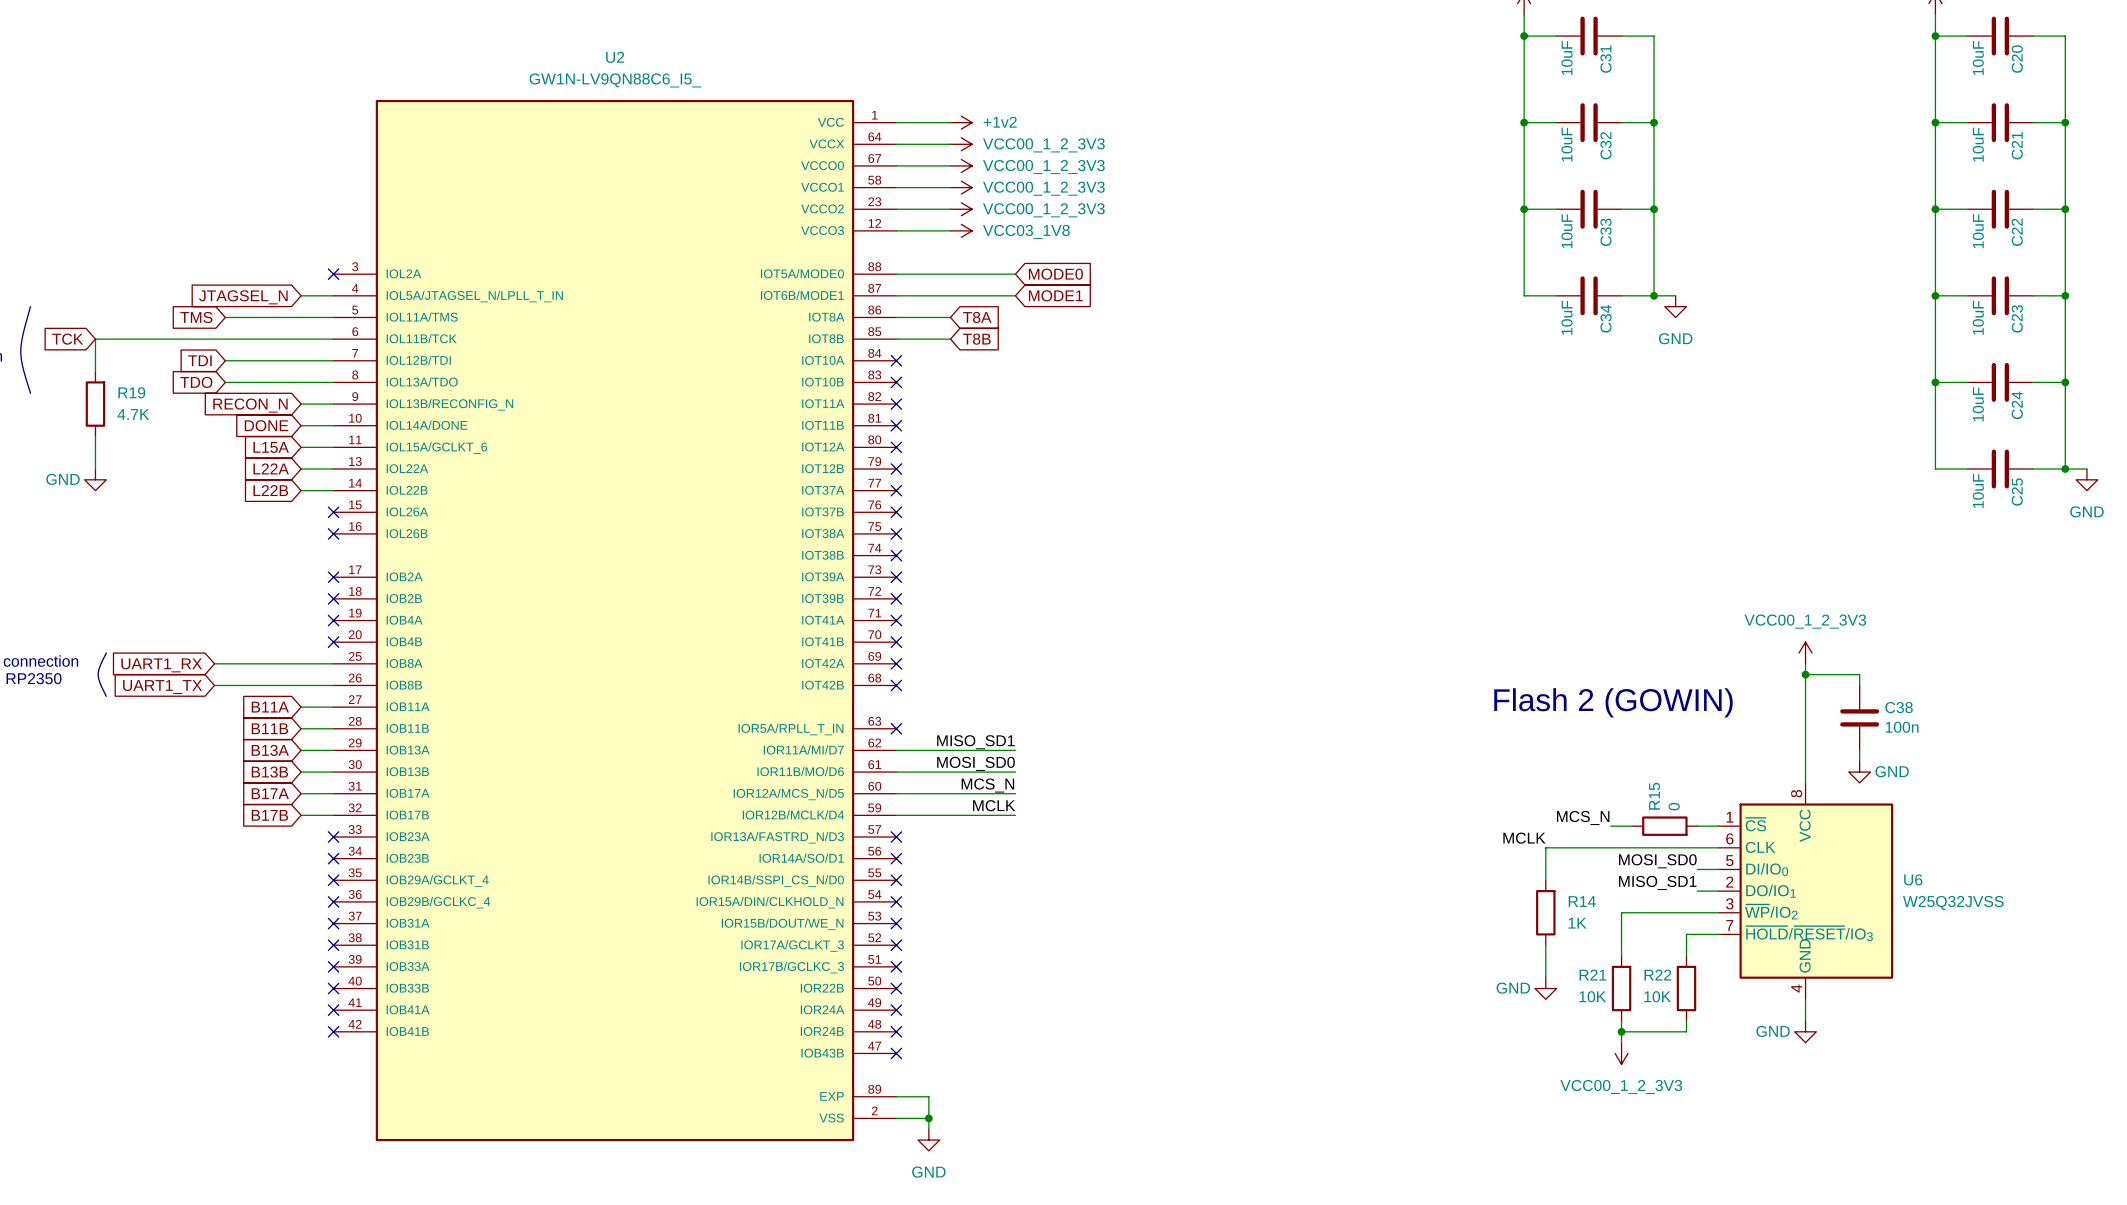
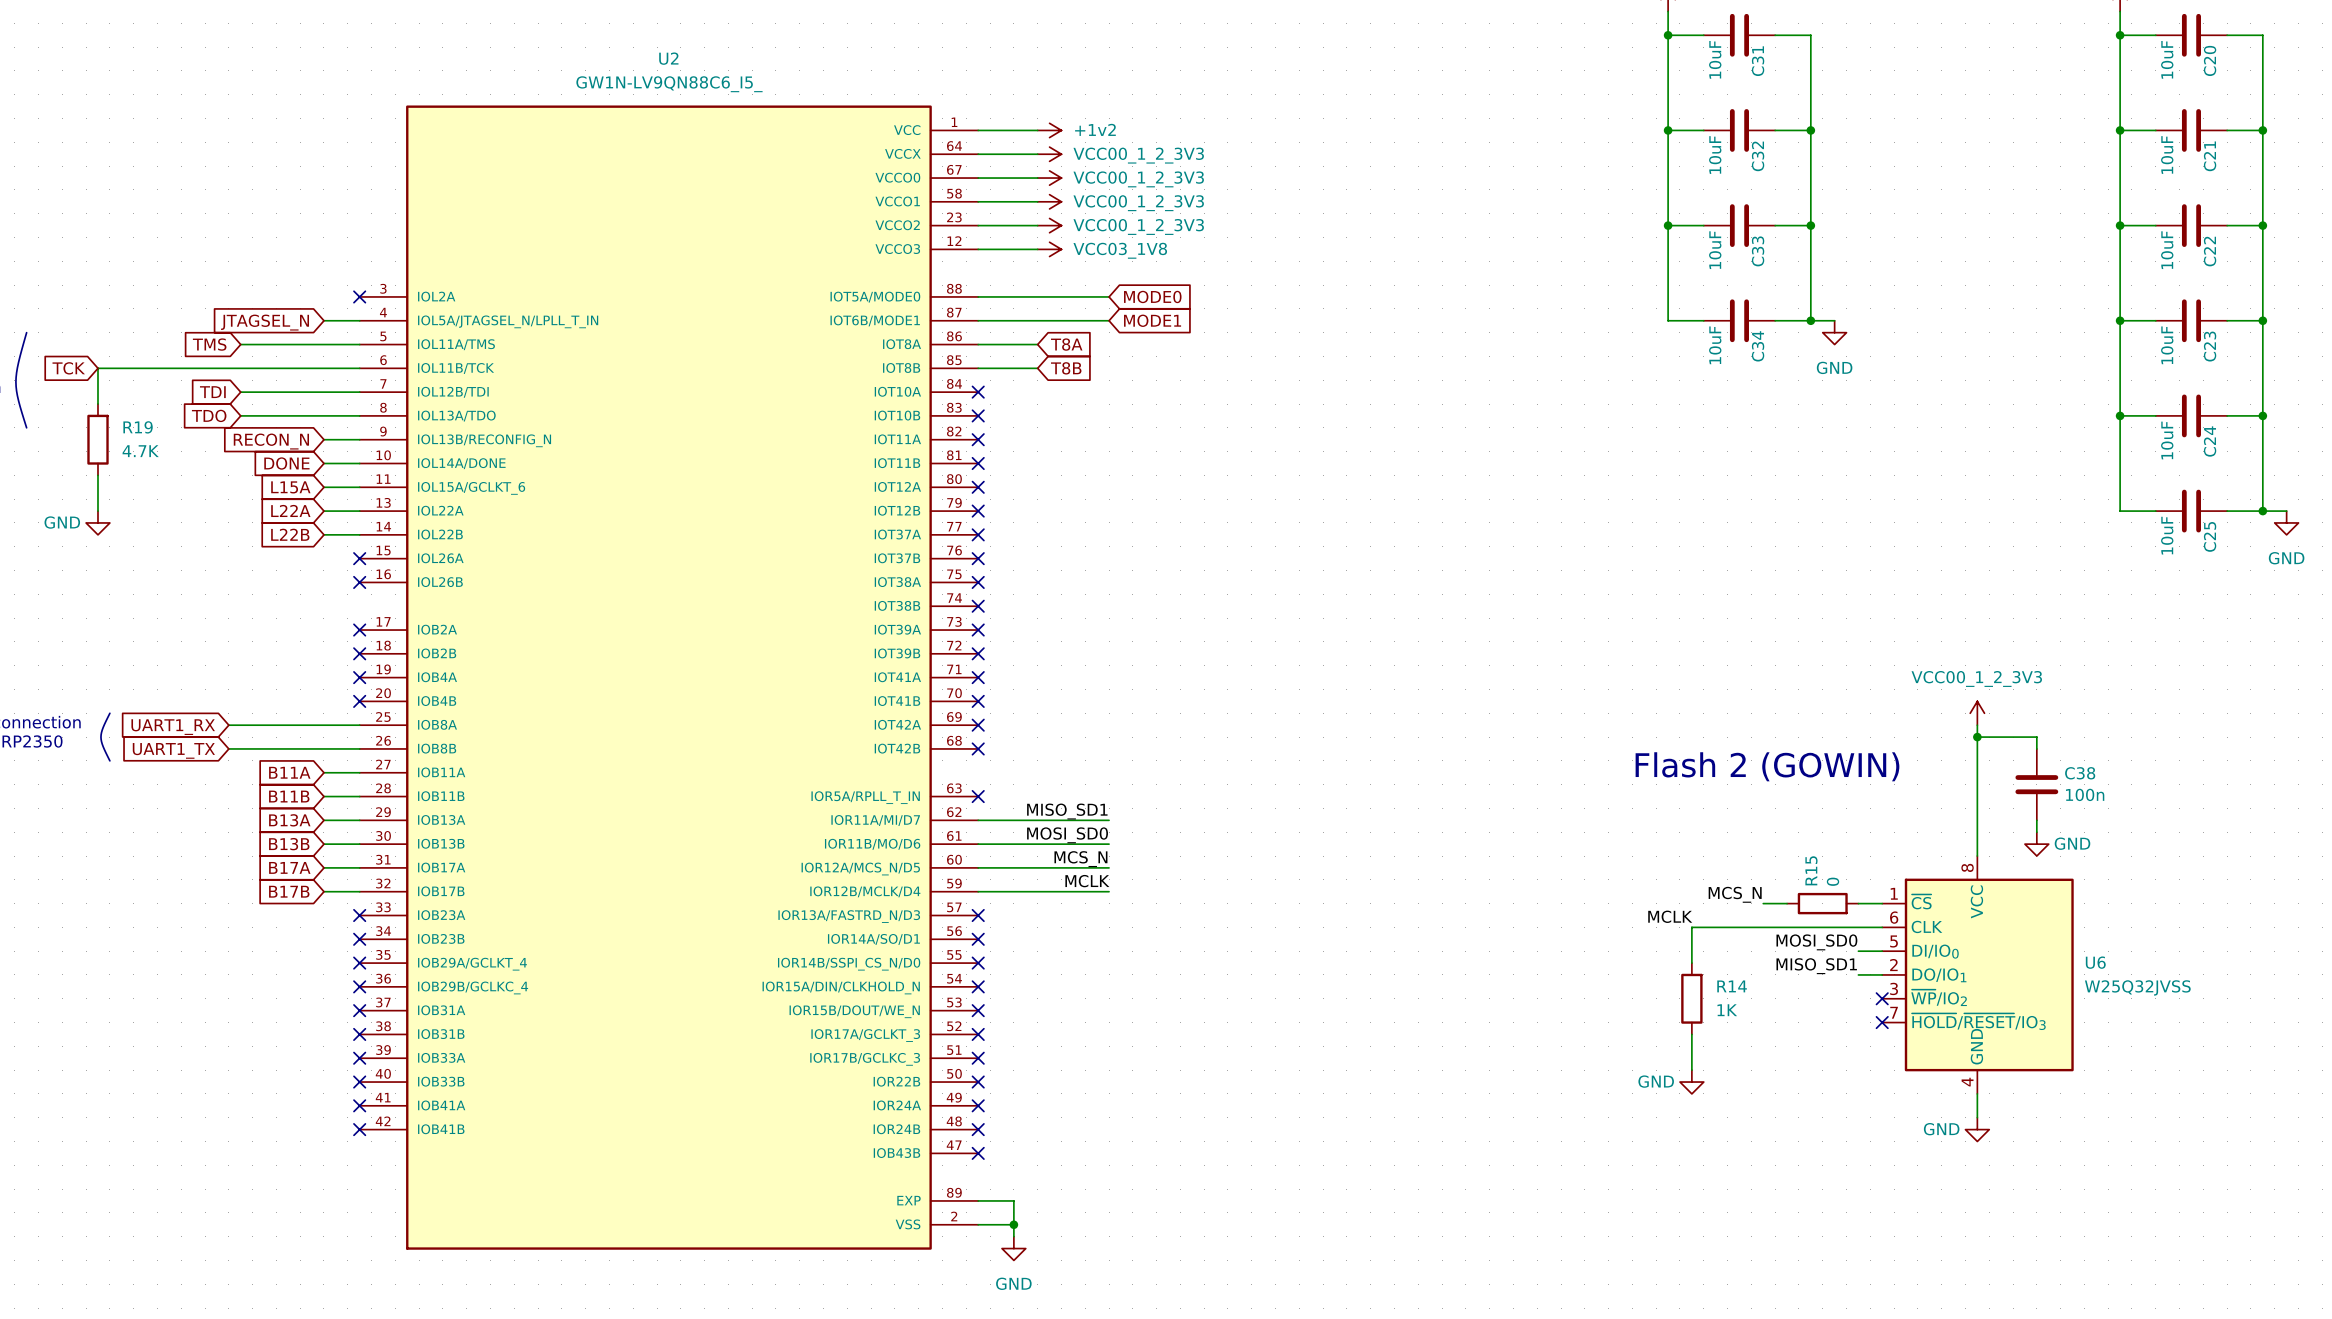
wire: (1718, 912) (1621, 912) (1621, 956) -> none
no-connect mark: none -> (1882, 998)
wire: (1718, 934) (1686, 934) (1686, 956) -> none
no-connect mark: none -> (1882, 1022)
R21: 10K (1621, 988) -> none
R22: 10K (1686, 988) -> none
wire: (1621, 1020) (1621, 1042) -> none
wire: (1686, 1020) (1686, 1031) (1621, 1031) -> none
junction: (1621, 1031) -> none
power symbol: VCC00_1_2_3V3 (1621, 1053) -> none

